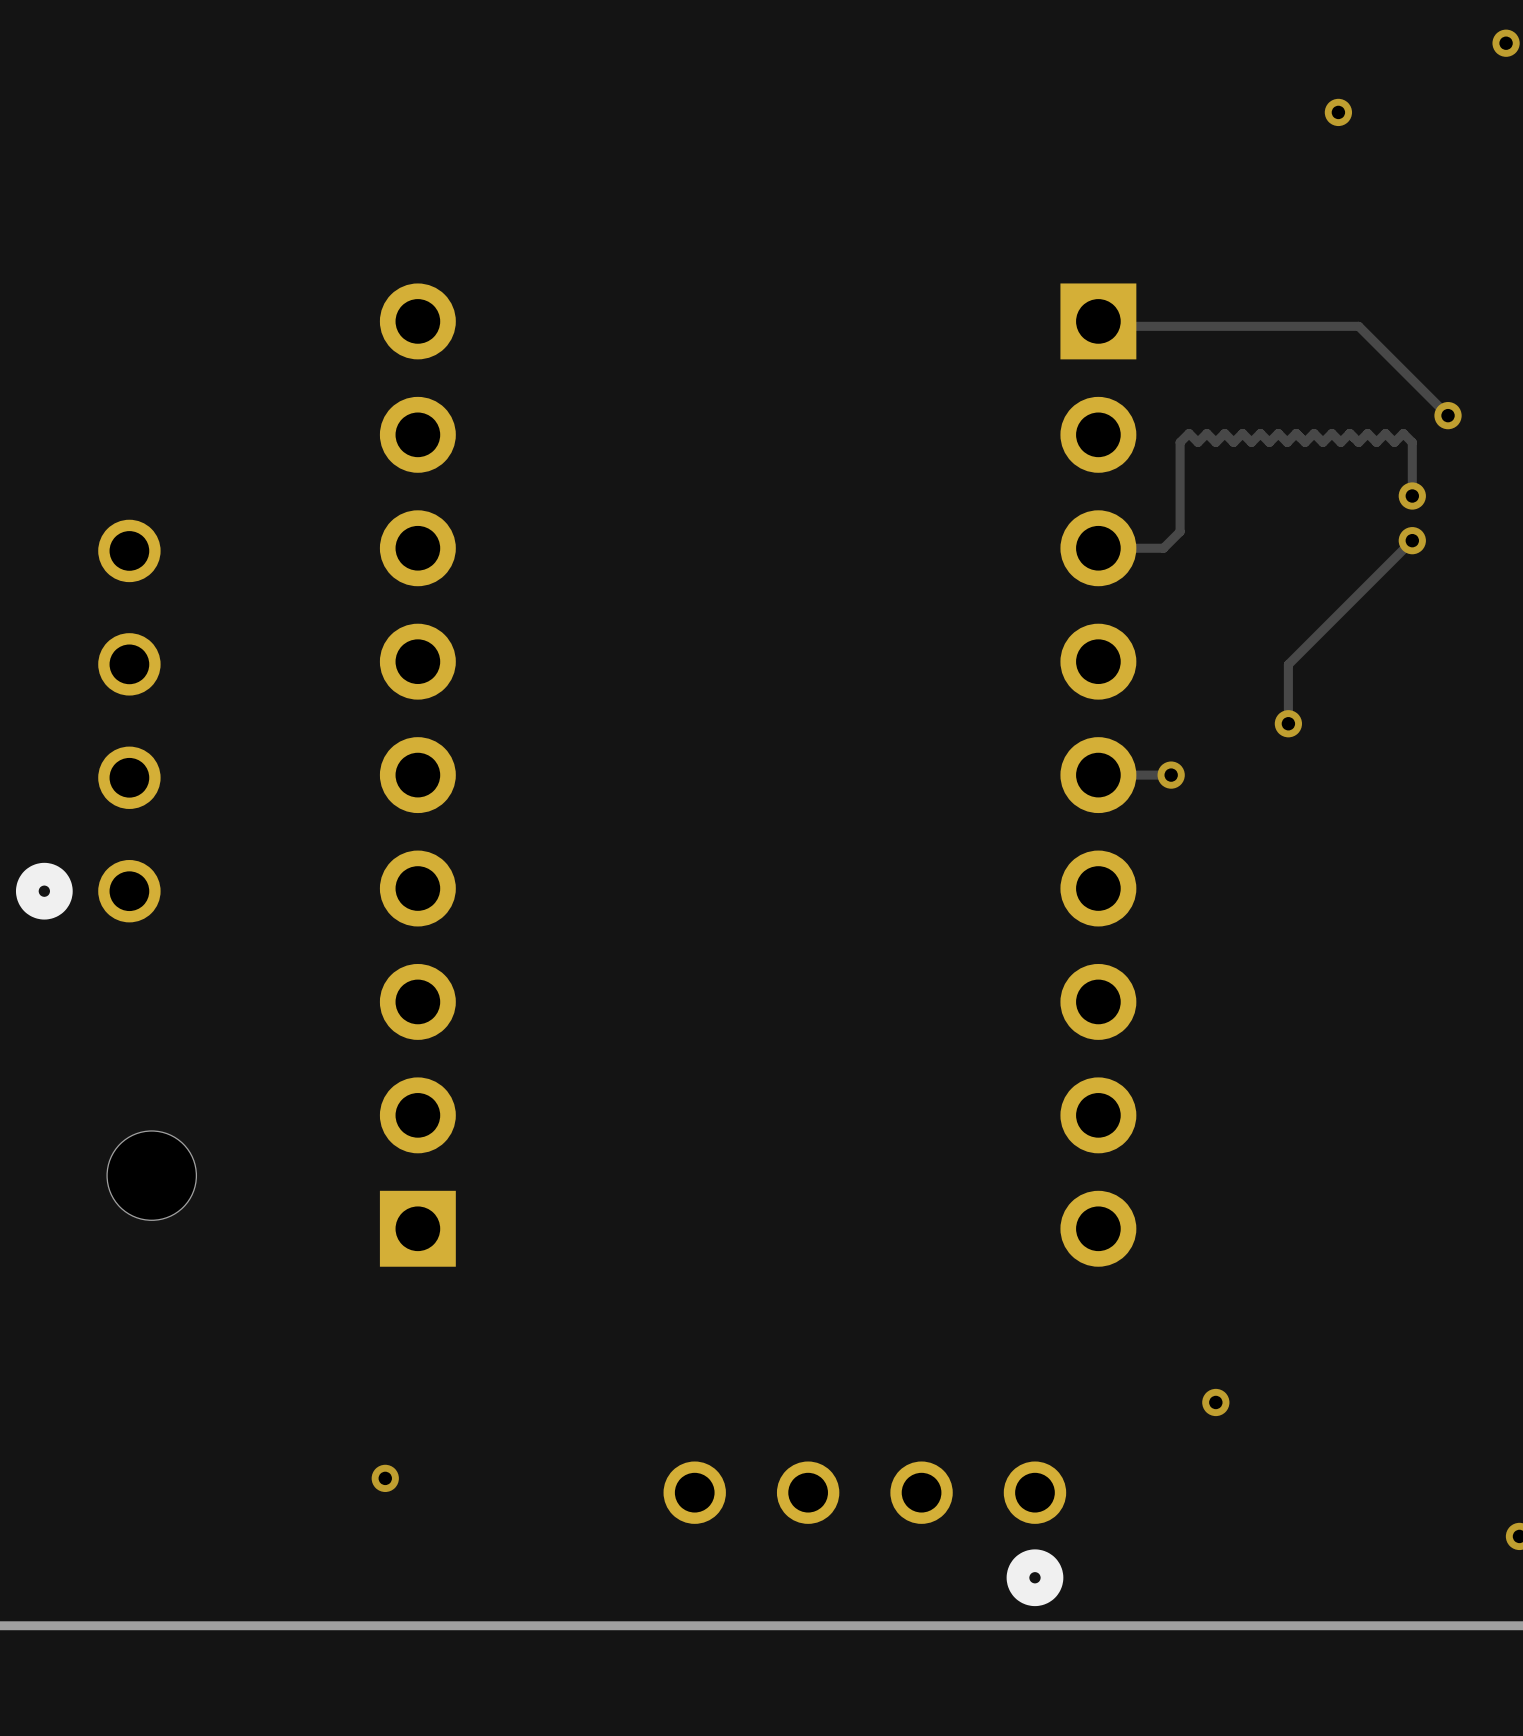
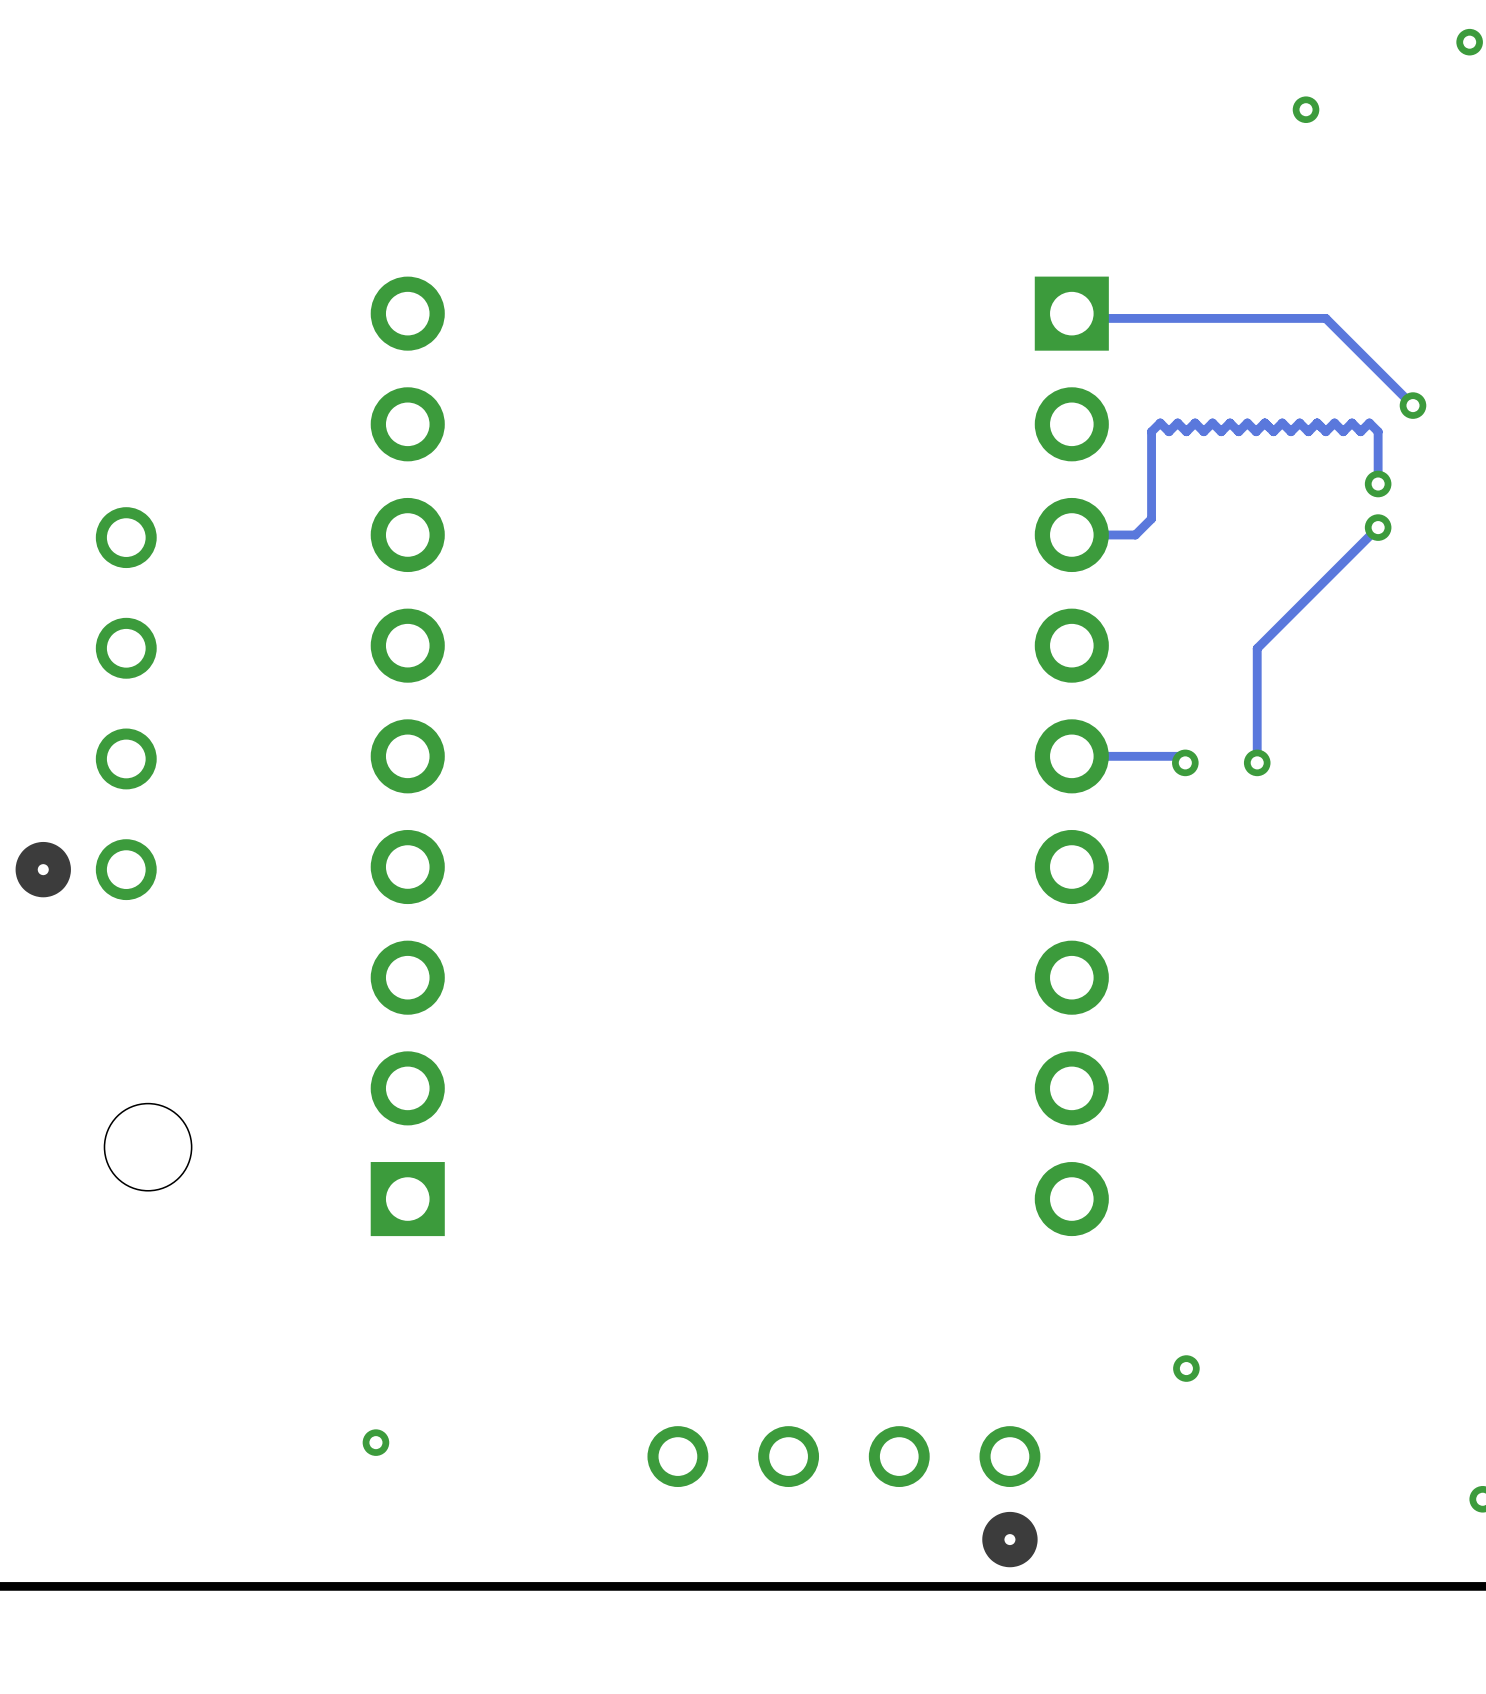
track: none -> (1257, 706) (1257, 762)
via: (1288, 723) -> none
via position: (1171, 775) -> (1185, 762)
track: none -> (1178, 756) (1142, 756)
via: none -> (1257, 762)

